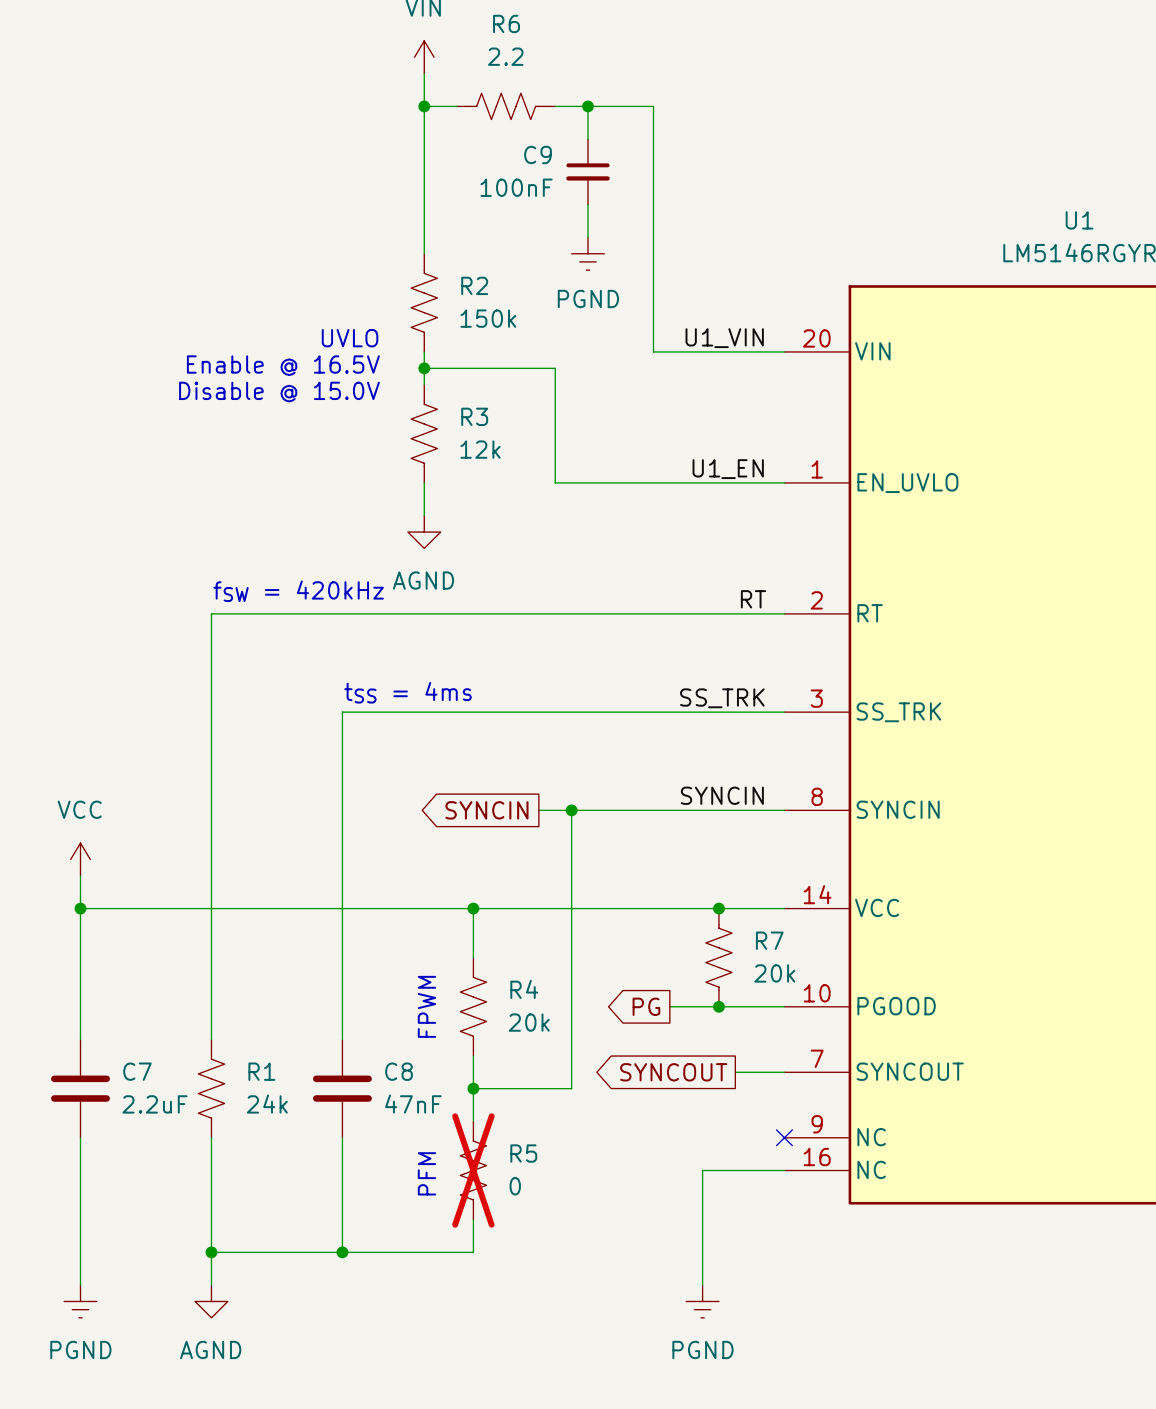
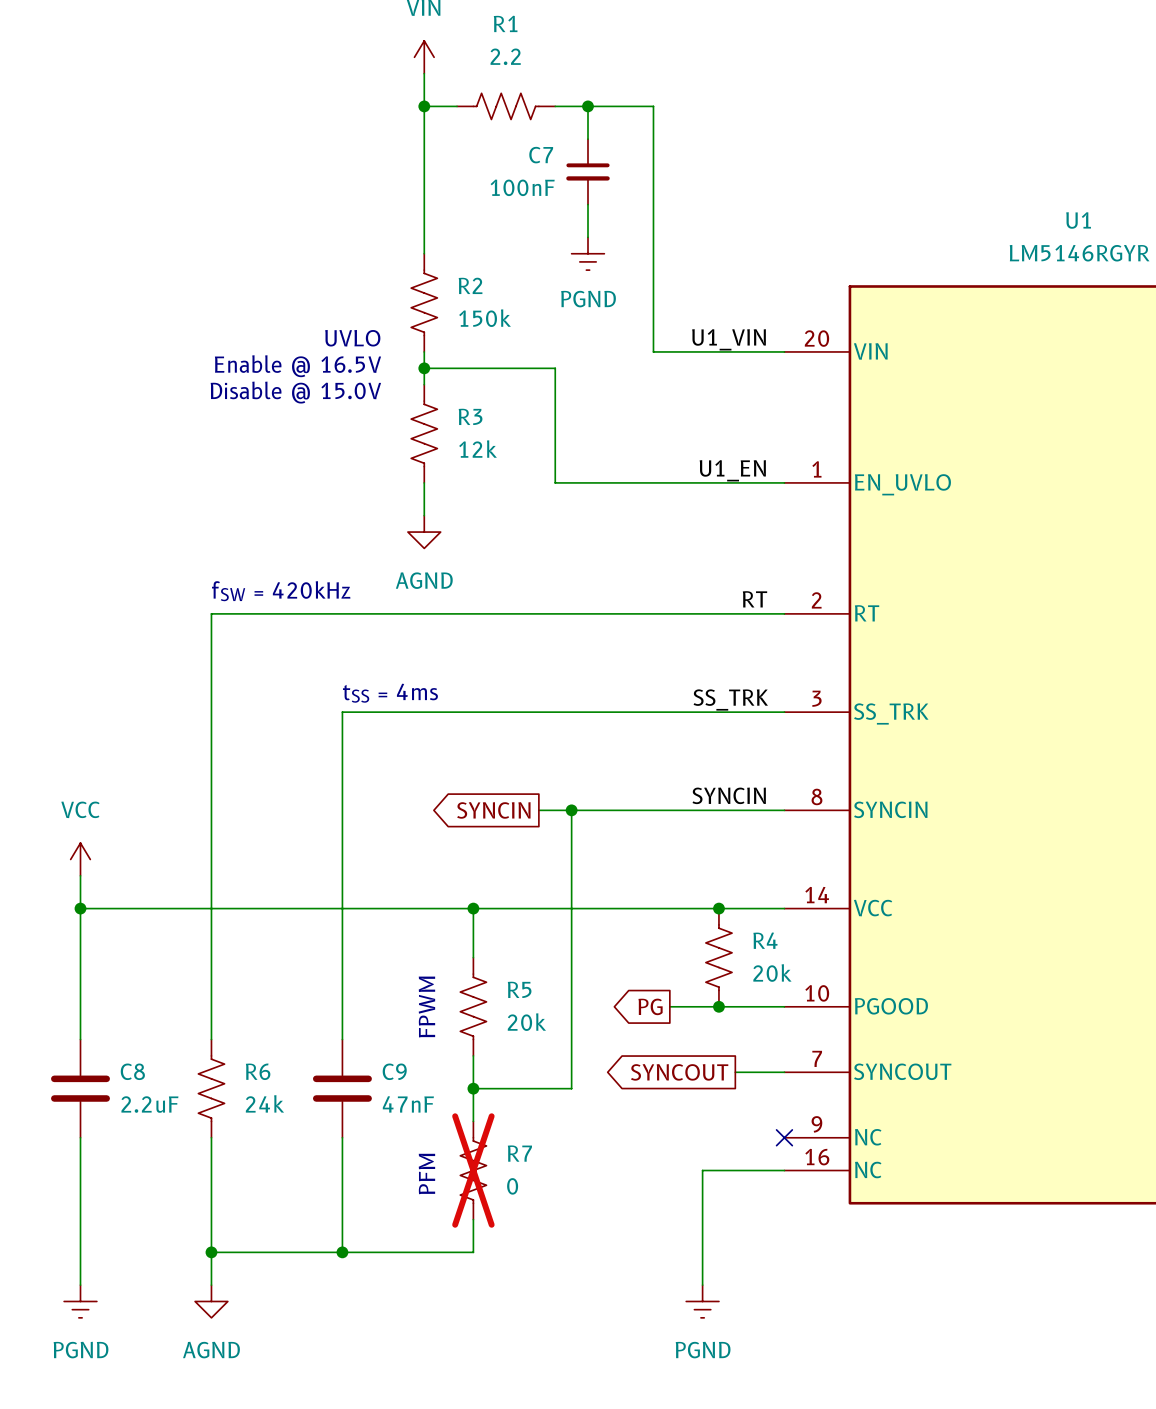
R6 name: R6 (506, 23) -> R1 (505, 23)
C9 name: C9 (537, 154) -> C7 (541, 155)
R7 name: R7 (769, 940) -> R4 (765, 940)
R4 name: R4 (524, 989) -> R5 (519, 989)
C7 name: C7 (137, 1071) -> C8 (132, 1071)
R1 name: R1 (261, 1071) -> R6 (258, 1071)
C8 name: C8 (399, 1071) -> C9 (394, 1071)
R5 name: R5 (523, 1153) -> R7 (519, 1153)

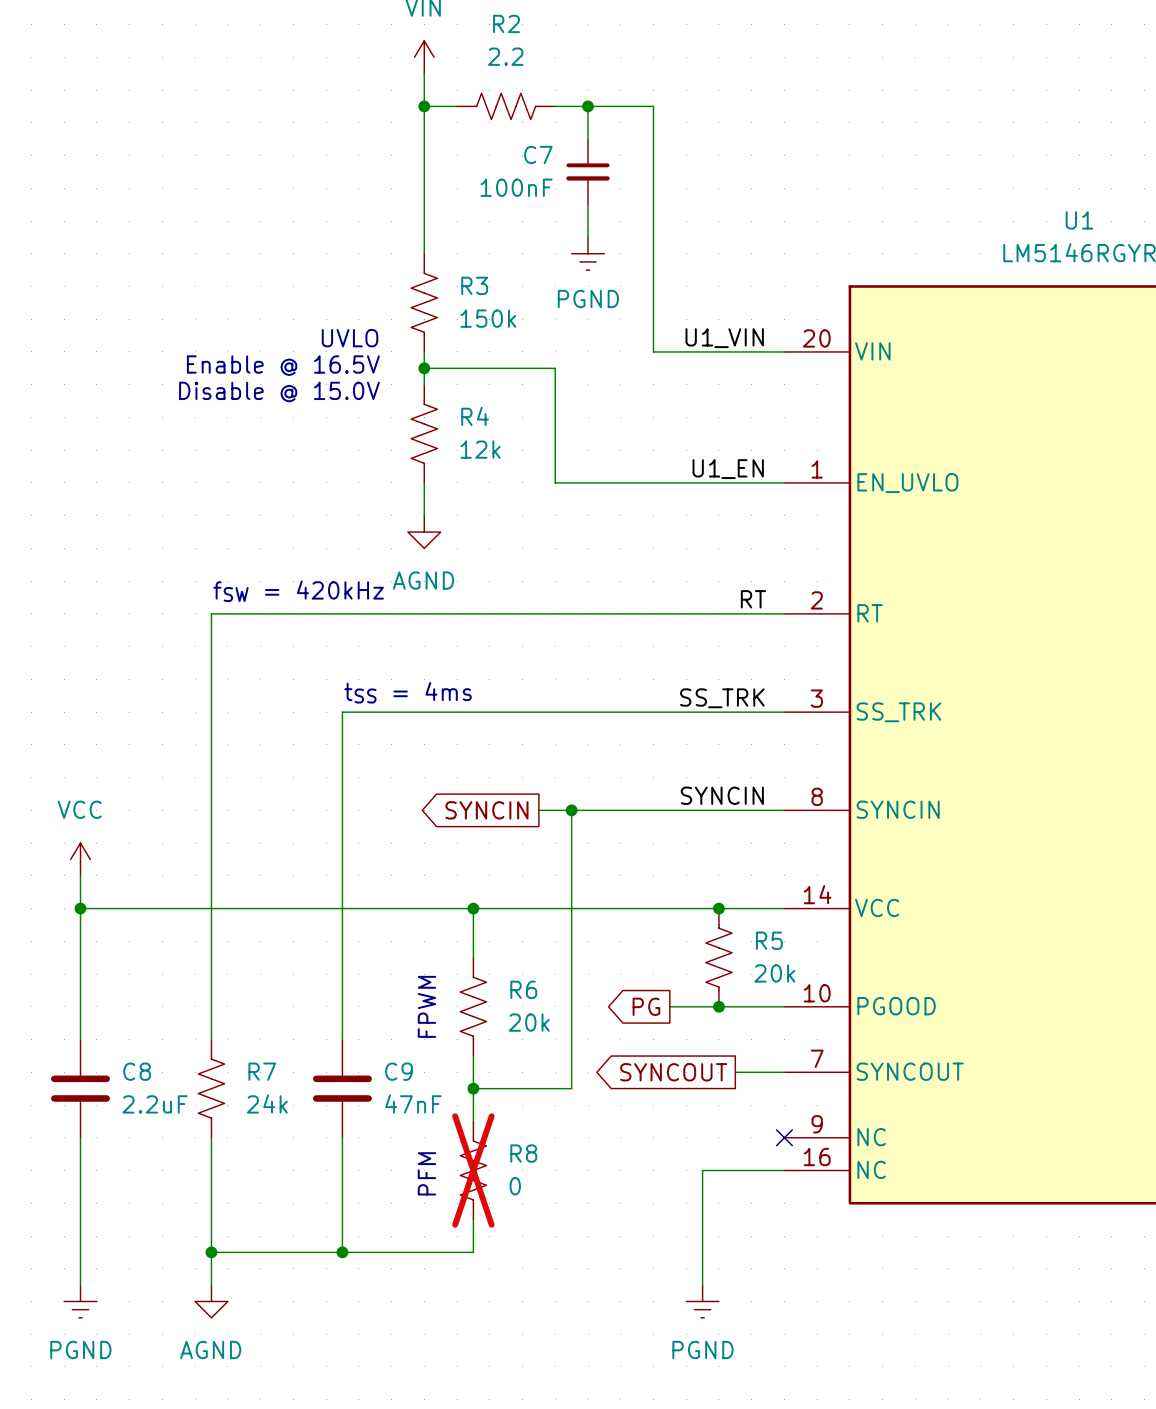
R1 name: R1 (505, 23) -> R2 (506, 23)
R2 name: R2 (470, 285) -> R3 (474, 285)
R3 name: R3 (470, 416) -> R4 (475, 416)
R4 name: R4 (765, 940) -> R5 (769, 940)
R5 name: R5 (519, 989) -> R6 (523, 989)
R6 name: R6 (258, 1071) -> R7 (262, 1071)
R7 name: R7 (519, 1153) -> R8 (523, 1153)

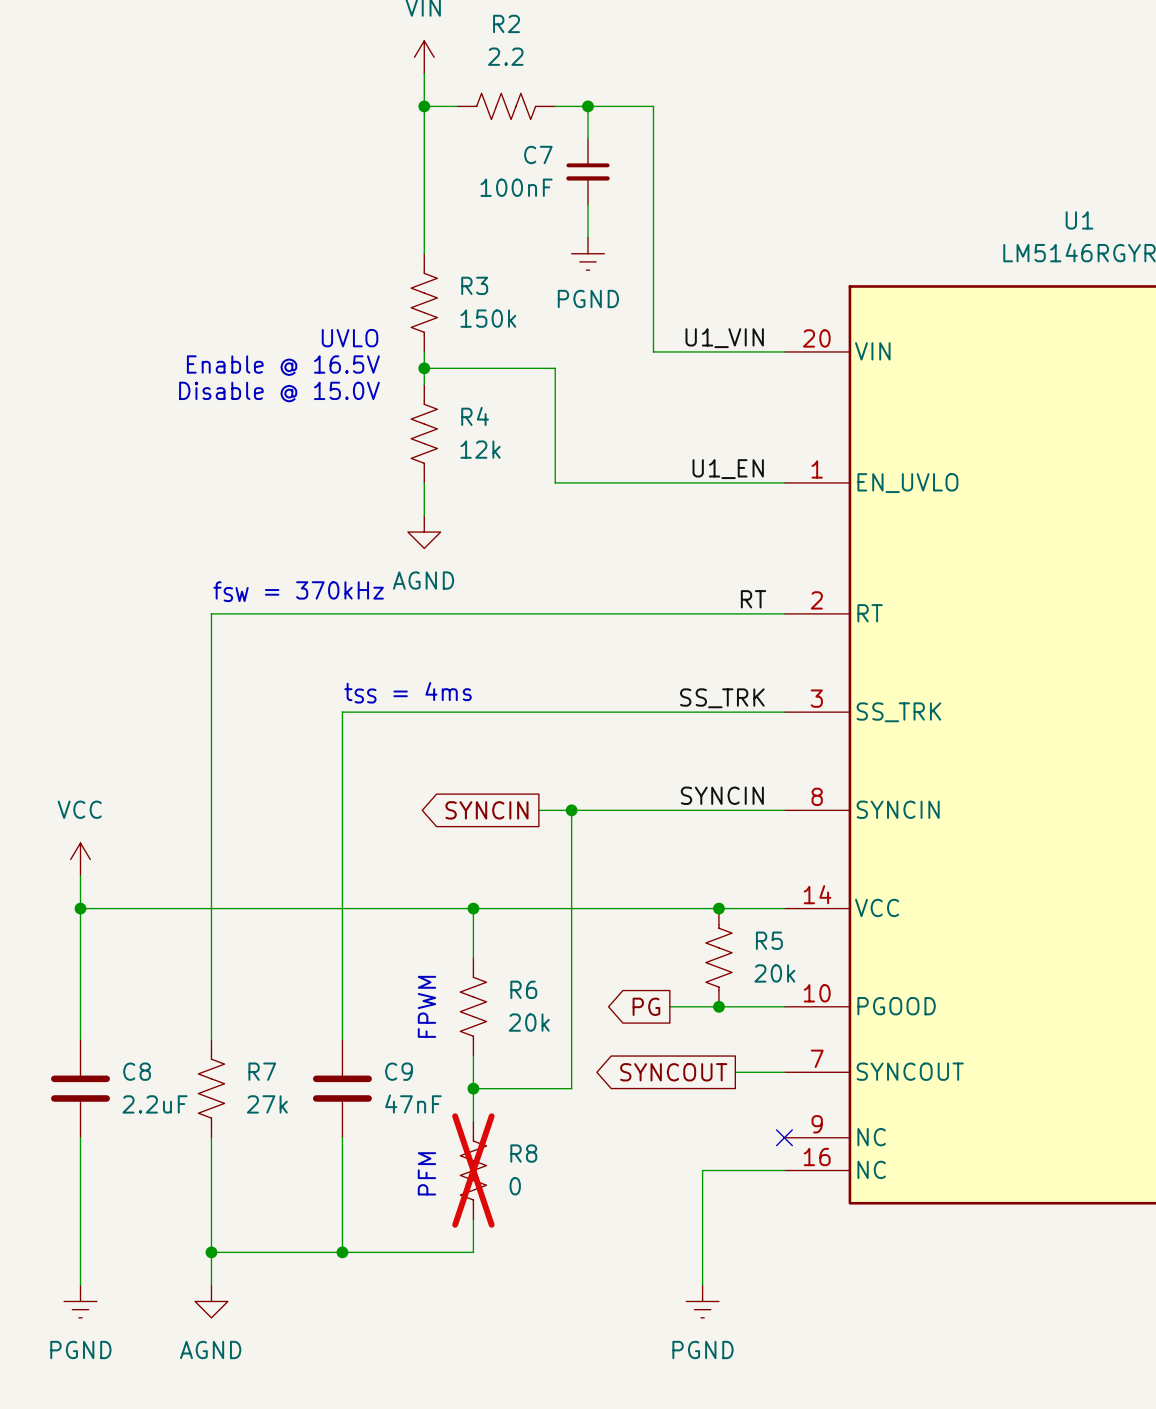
text: fSW = 420kHz (298, 591) -> fSW = 370kHz (298, 591)
R7 value: 24k (267, 1104) -> 27k (267, 1104)

